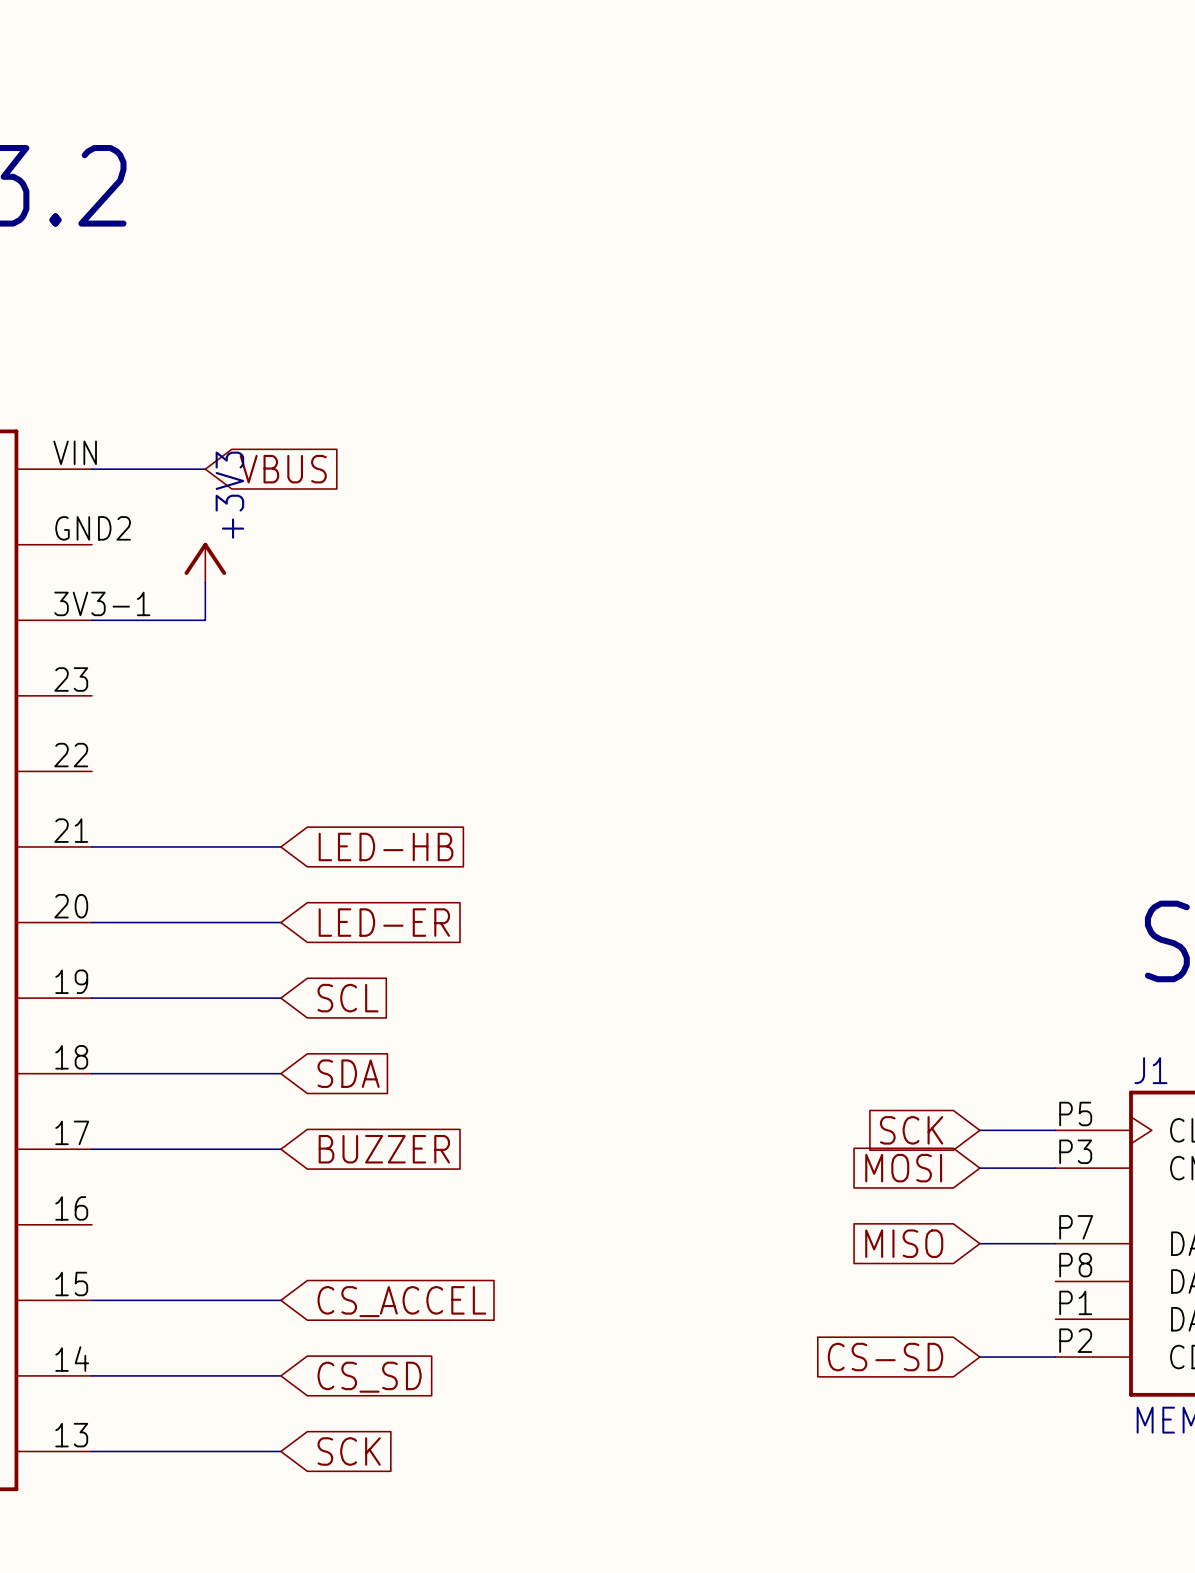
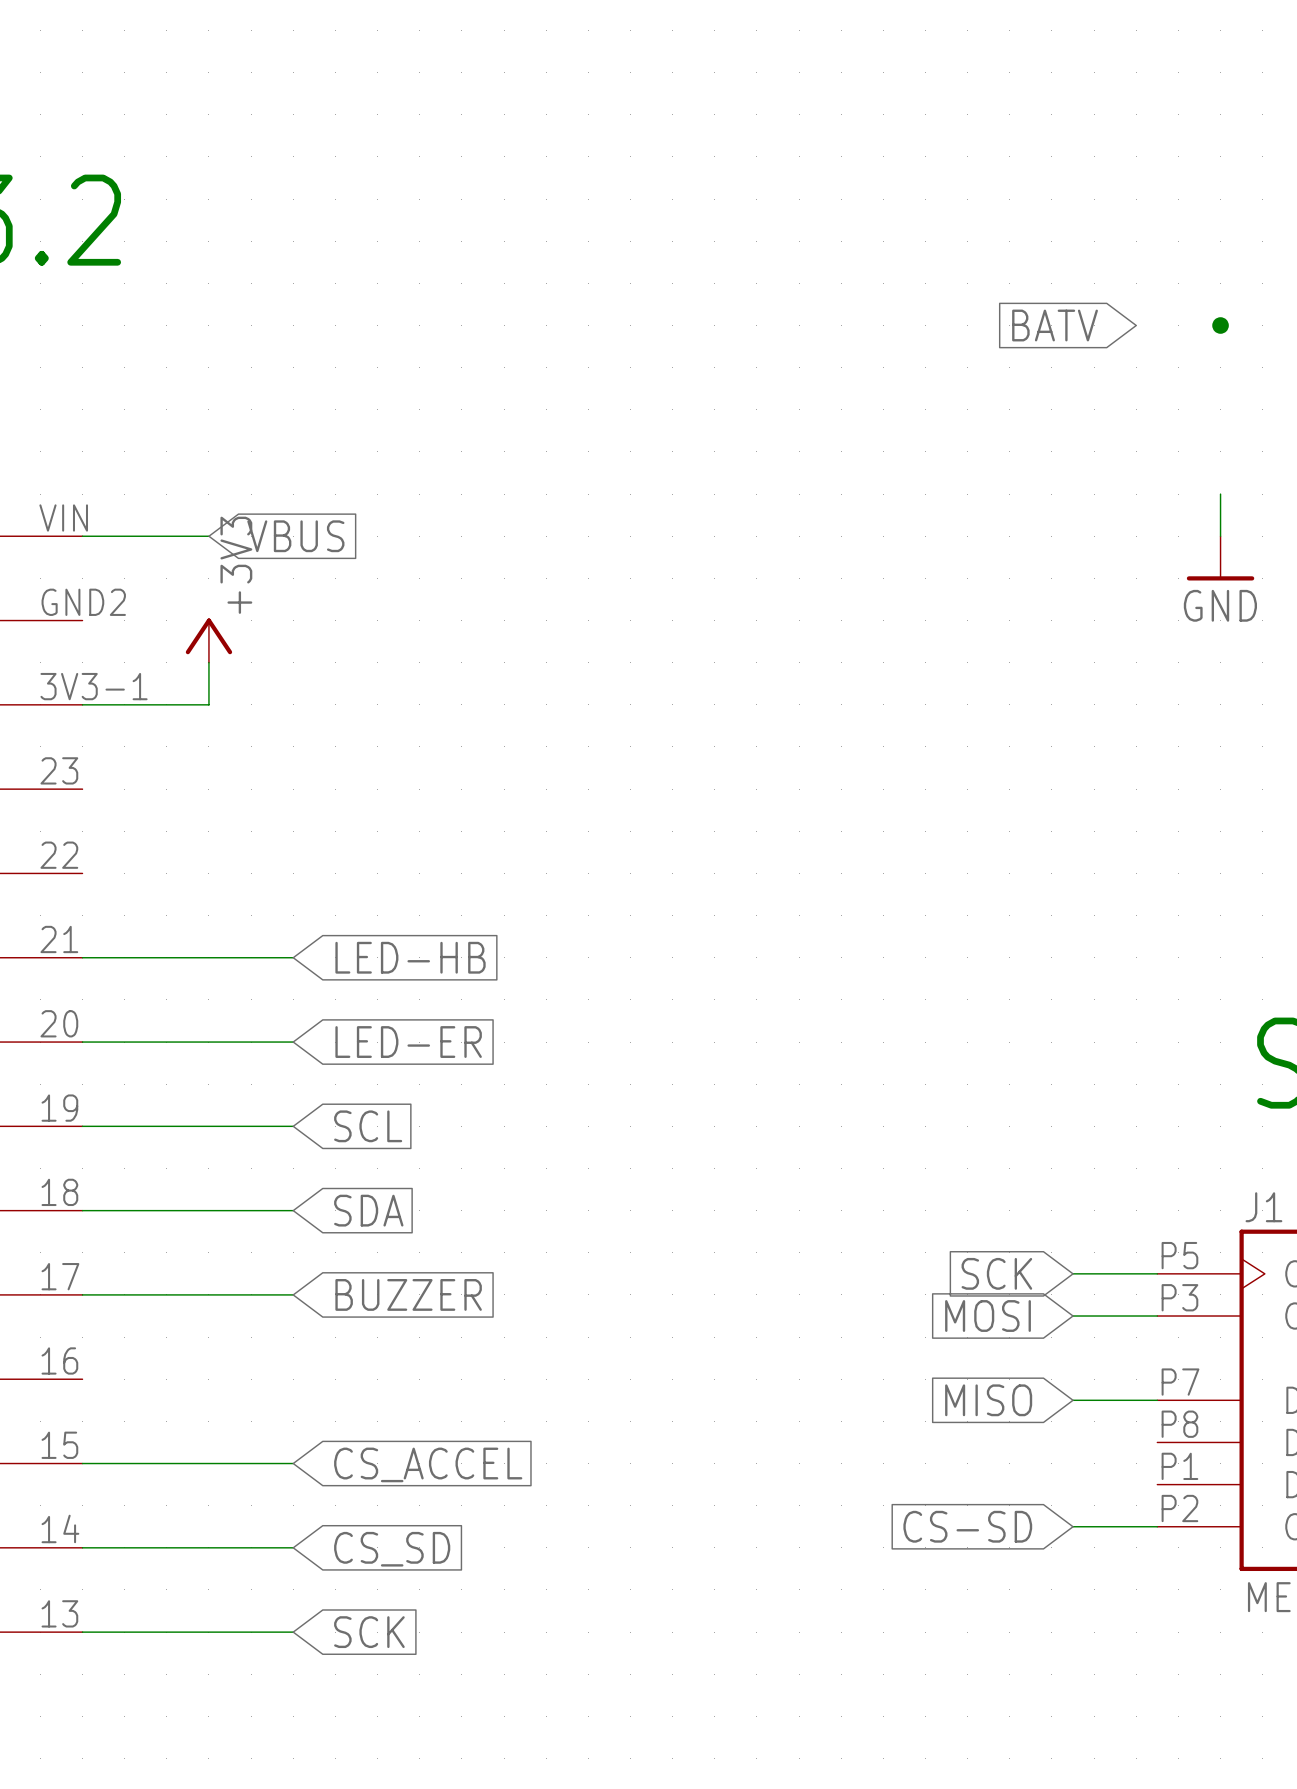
global label: none -> BATV (1055, 325)
junction: none -> (1220, 325)
wire: none -> (1220, 494) (1220, 536)
power symbol: none -> GND (1220, 558)

